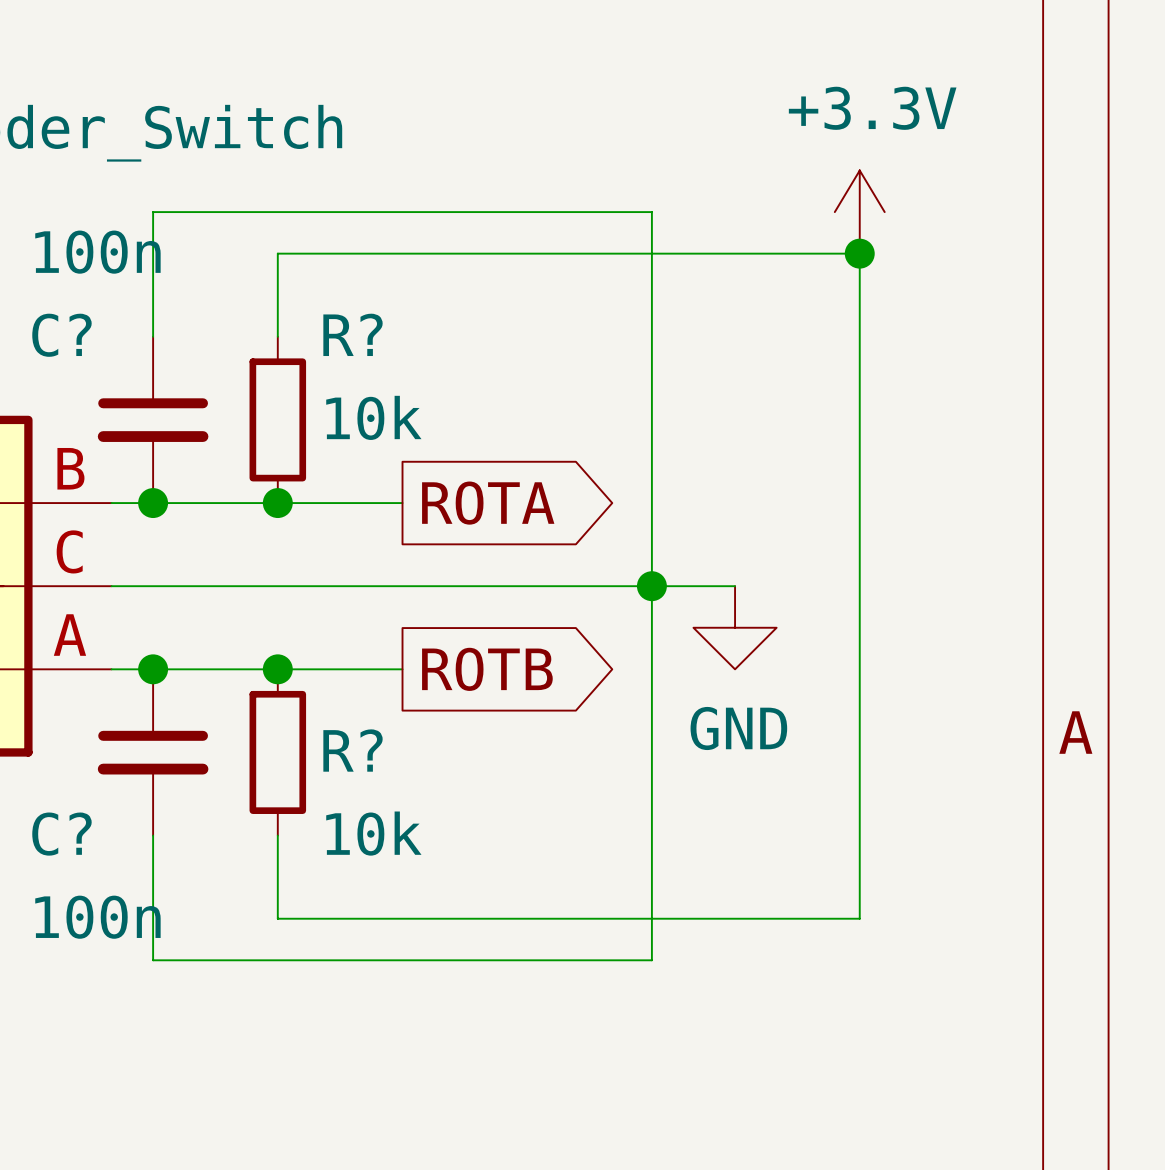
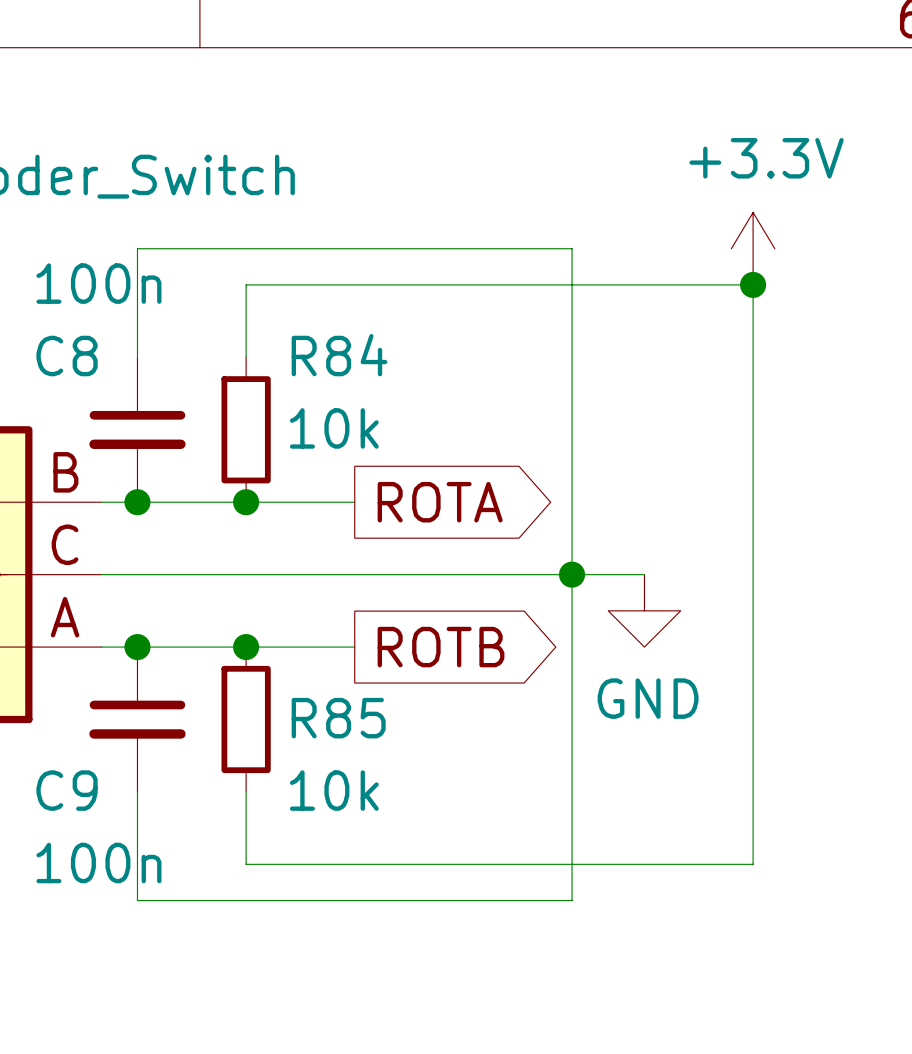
R? name: R? (353, 334) -> R84 (339, 355)
C? name: C? (61, 335) -> C8 (67, 356)
R? name: R? (353, 750) -> R85 (338, 718)
C? name: C? (61, 834) -> C9 (67, 790)

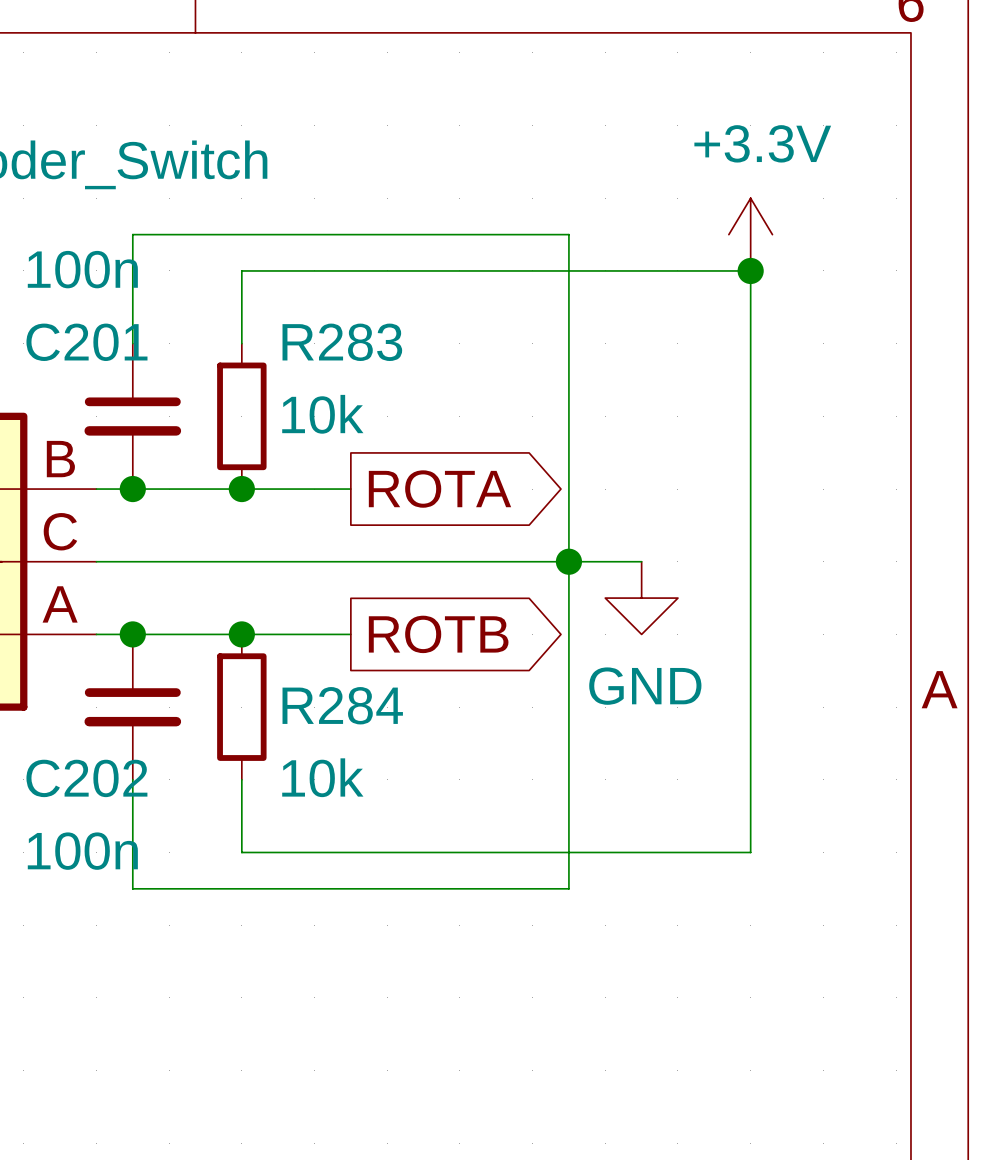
R84 name: R84 (339, 355) -> R283 (342, 342)
C8 name: C8 (67, 356) -> C201 (86, 342)
R85 name: R85 (338, 718) -> R284 (342, 705)
C9 name: C9 (67, 790) -> C202 (86, 778)

